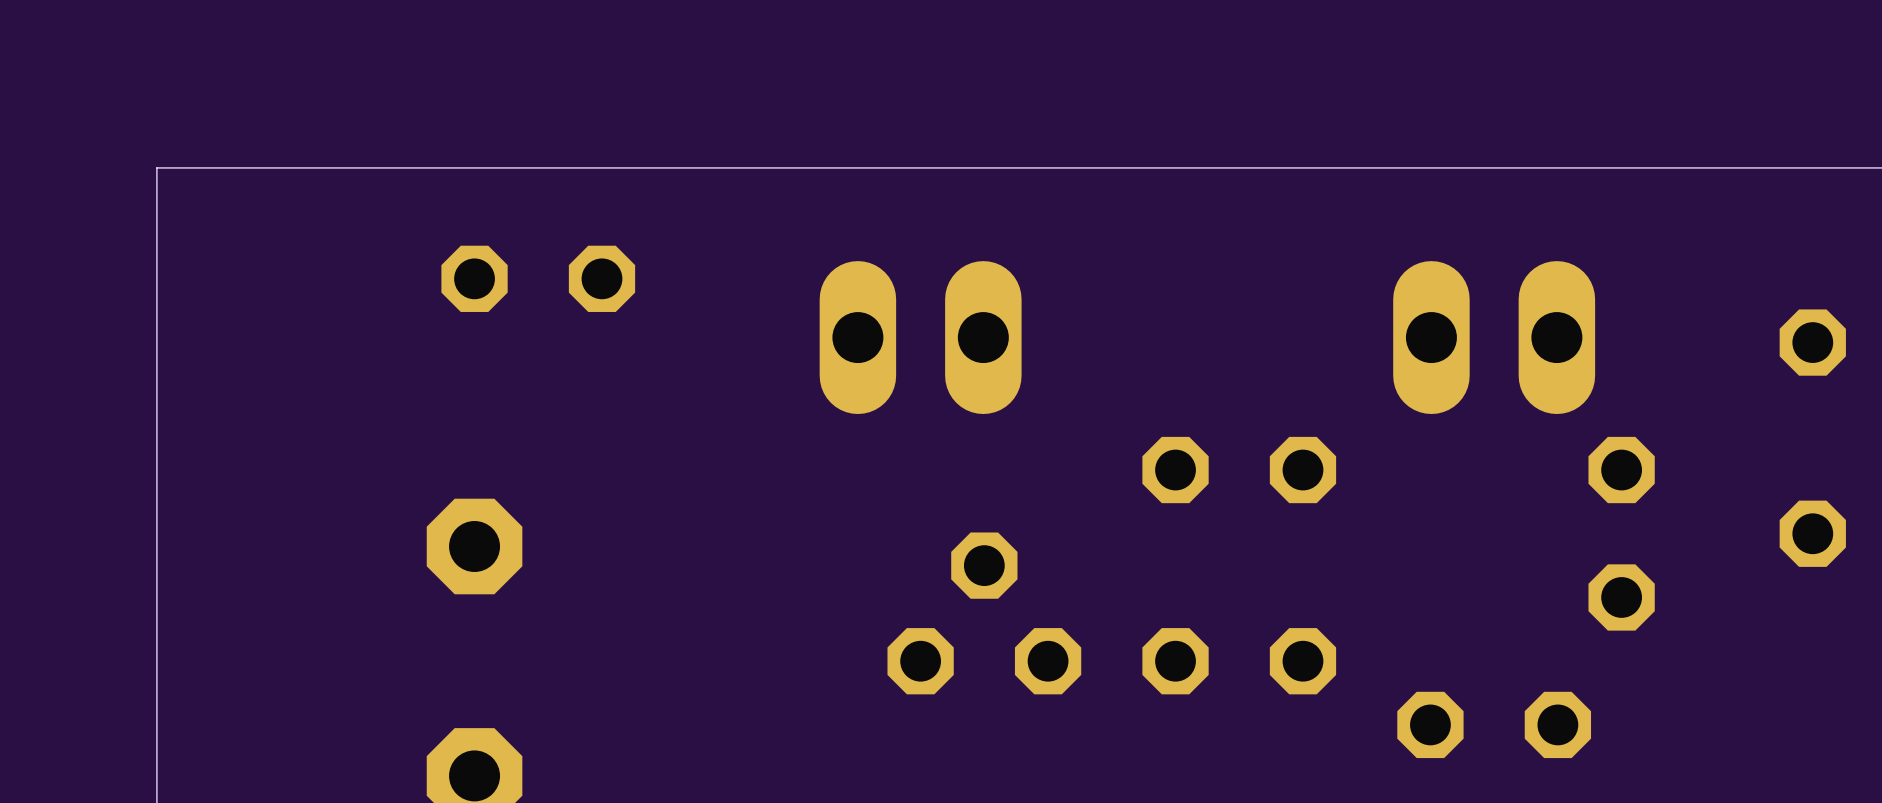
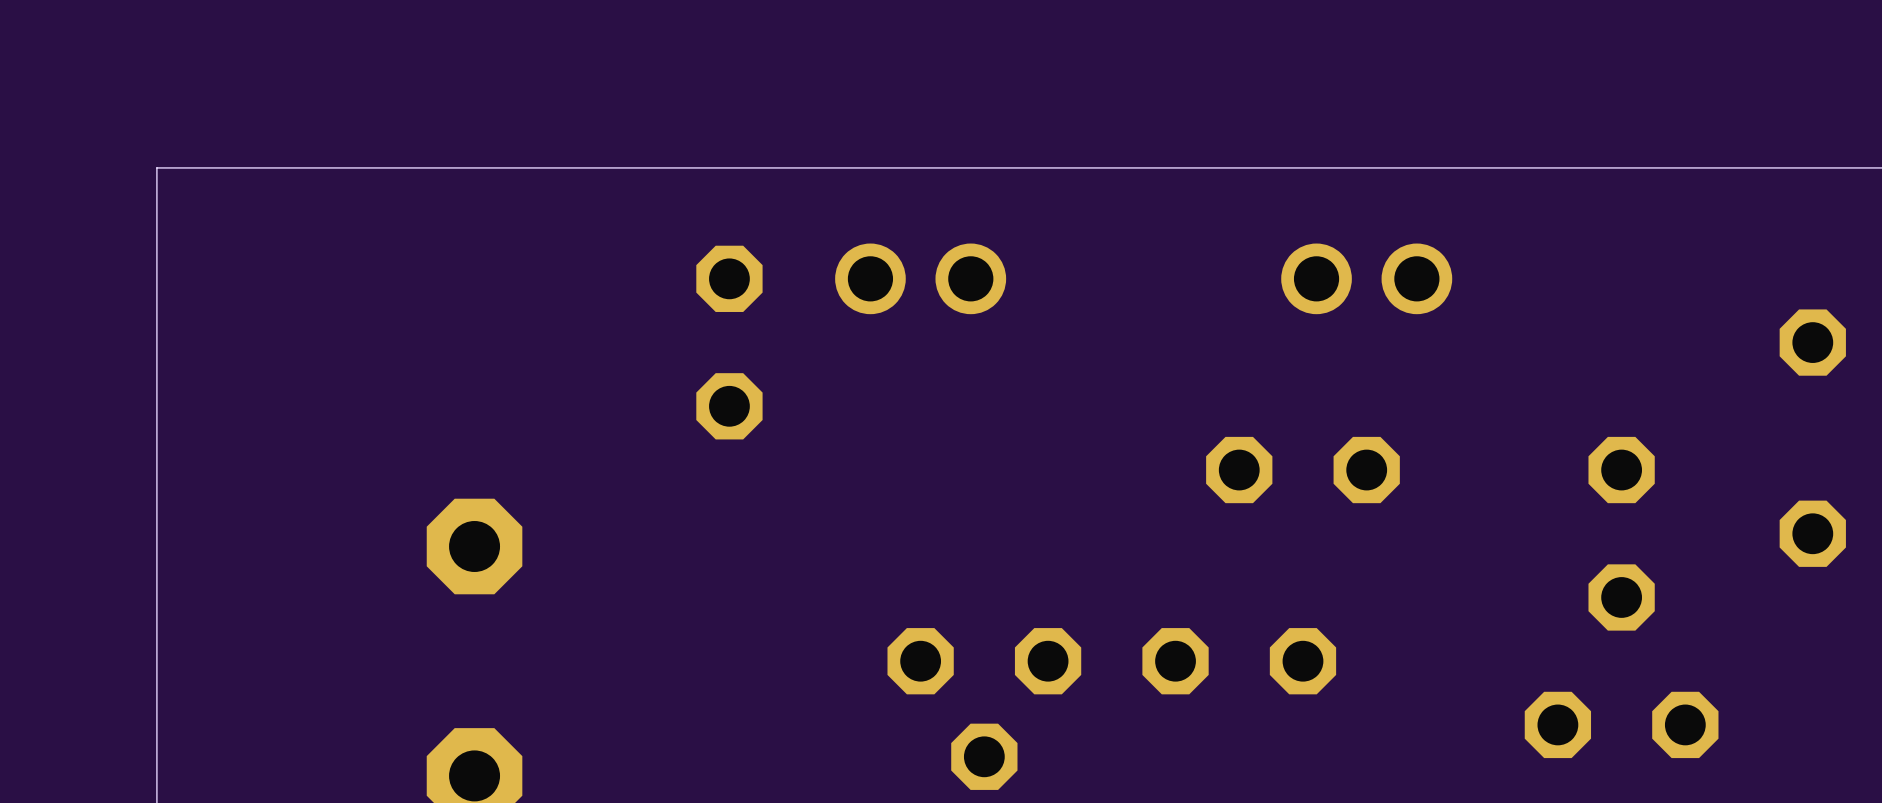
part rotation: 0° (538, 278) -> 90° clockwise (729, 342)
part position: (538, 278) -> (729, 342)
part: none -> (920, 278)
part: none -> (1366, 278)
part: (920, 337) -> none
part: (1494, 337) -> none
part position: (1239, 470) -> (1302, 470)
part rotation: 0° (984, 613) -> 180° (984, 709)
part position: (1494, 724) -> (1621, 724)

